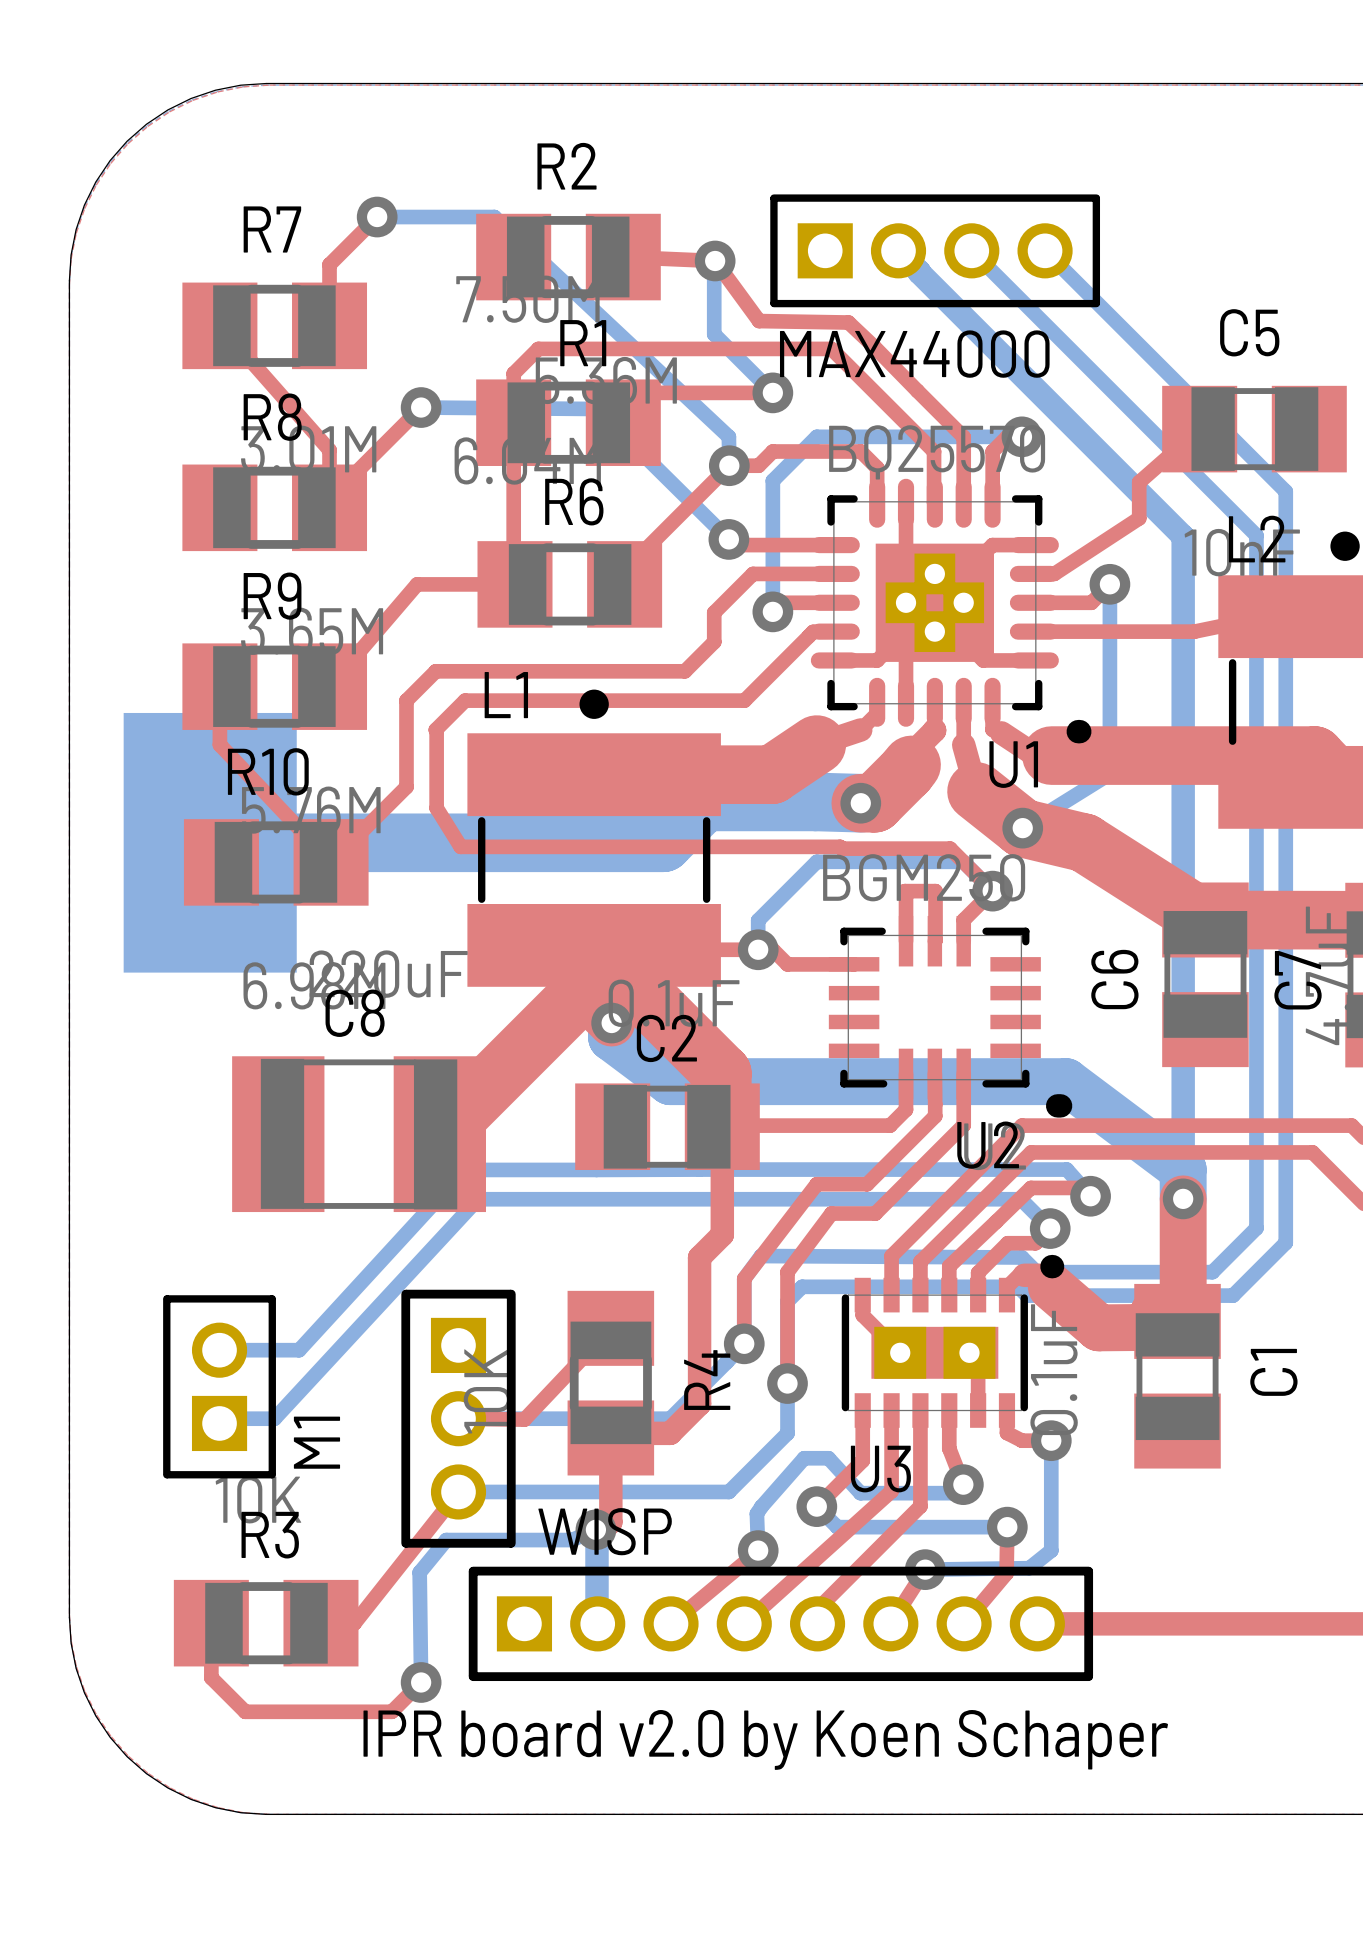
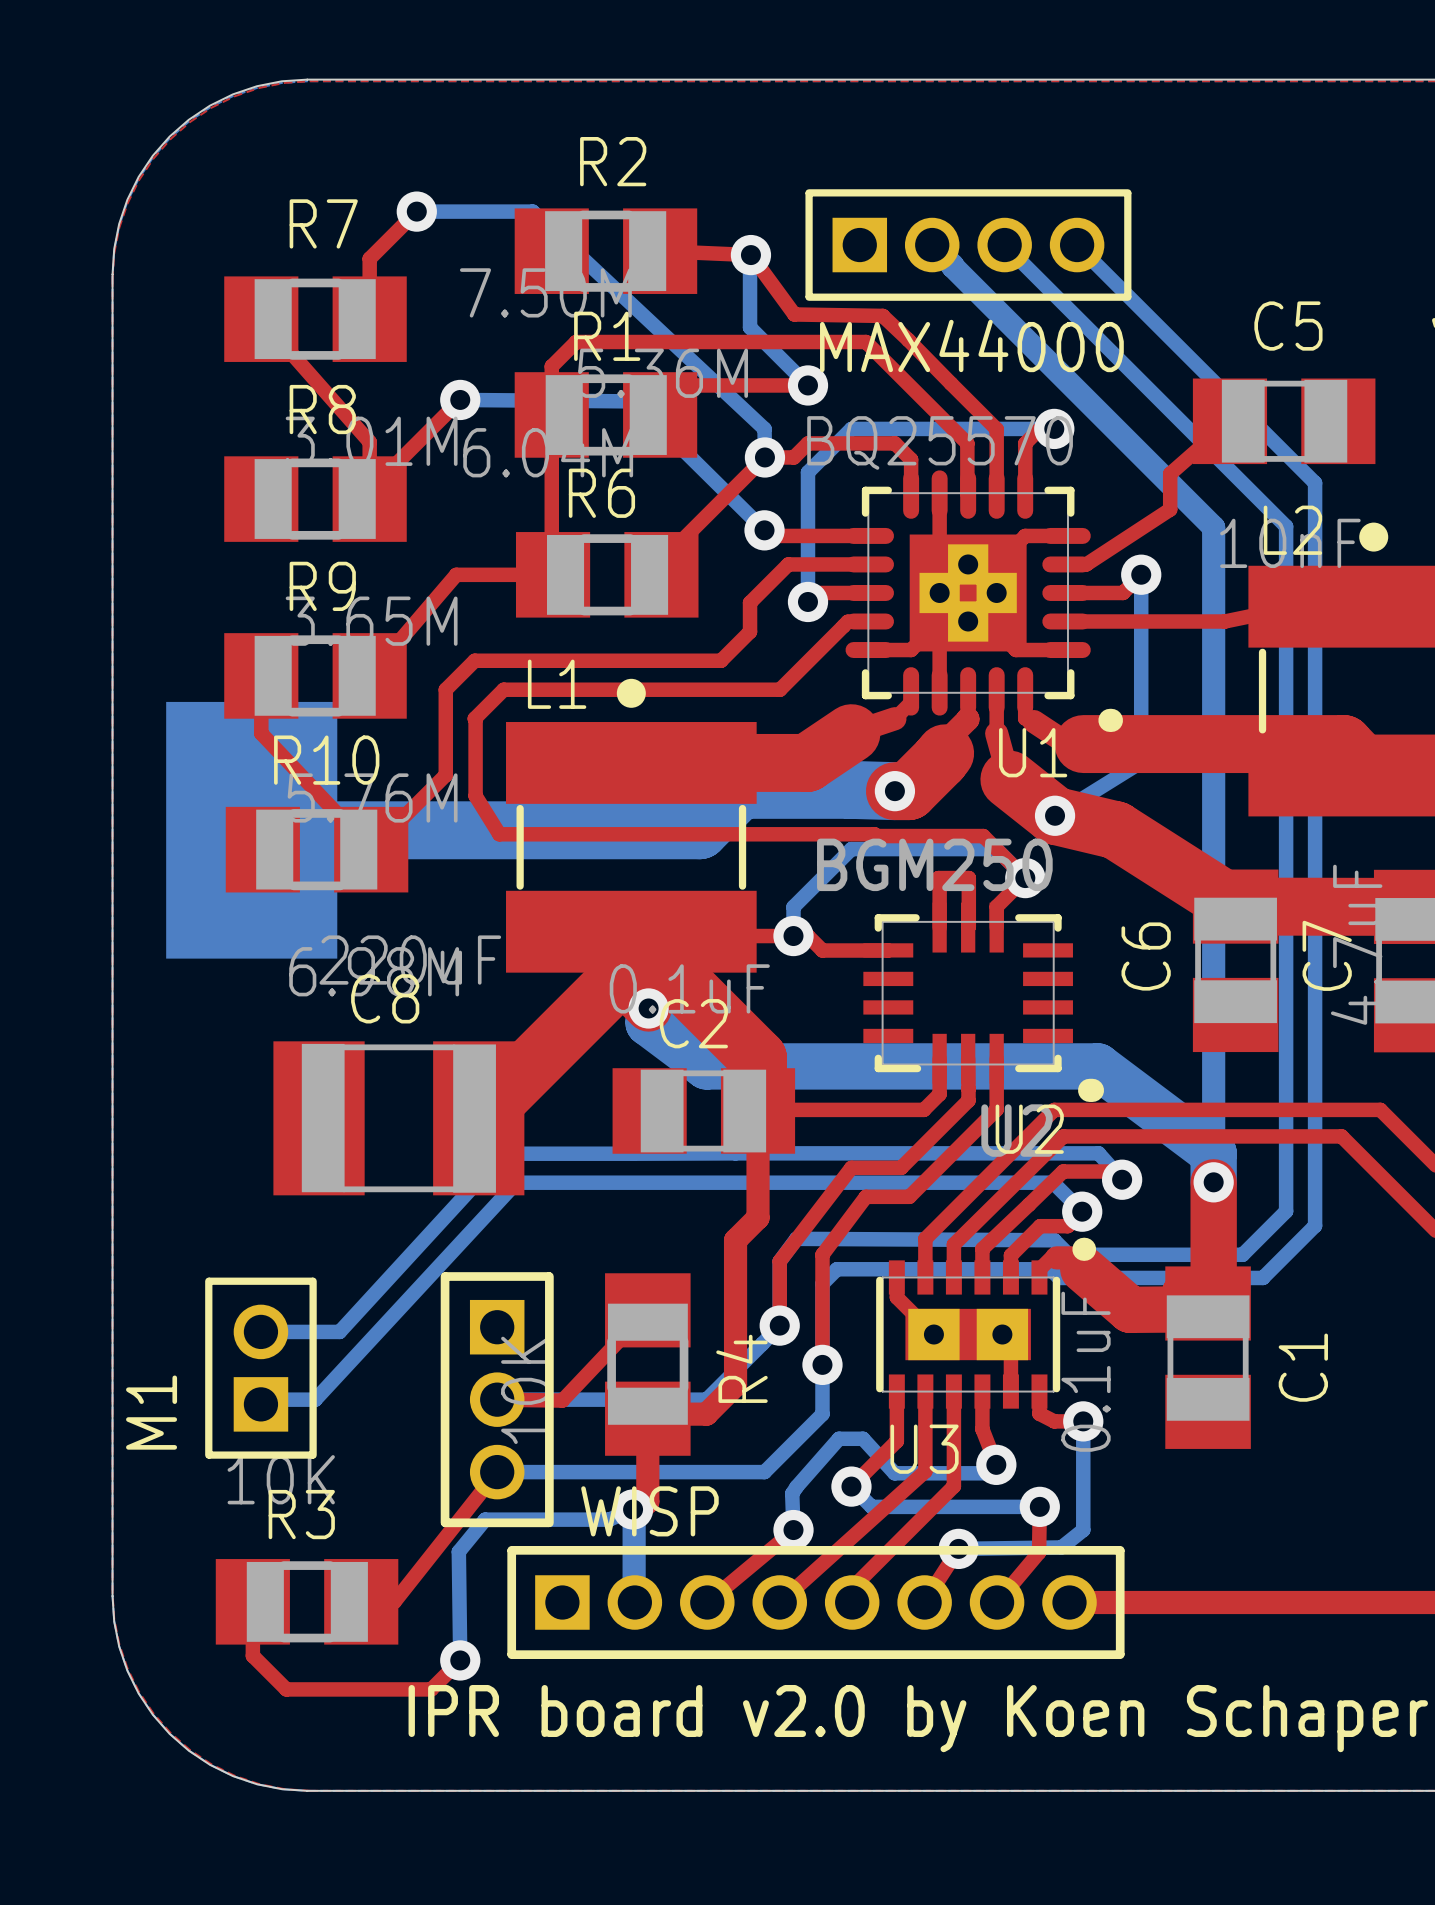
M1 name position: M1 (316, 1442) -> M1 (151, 1412)

